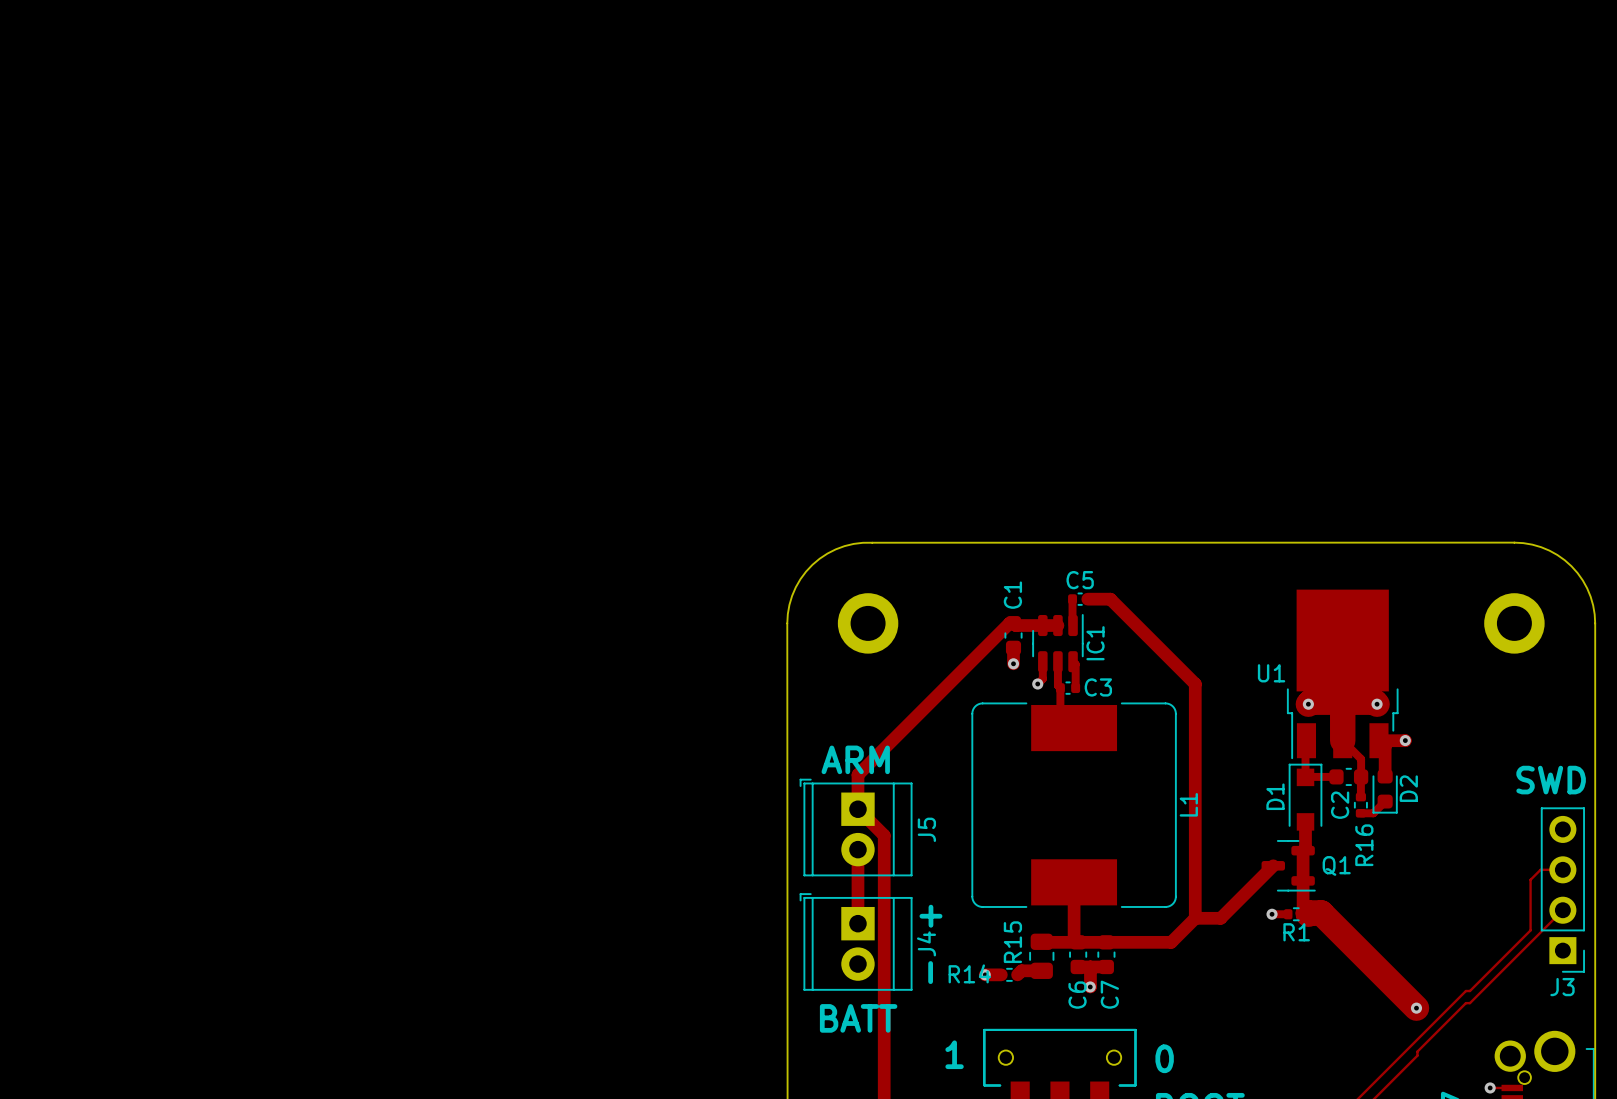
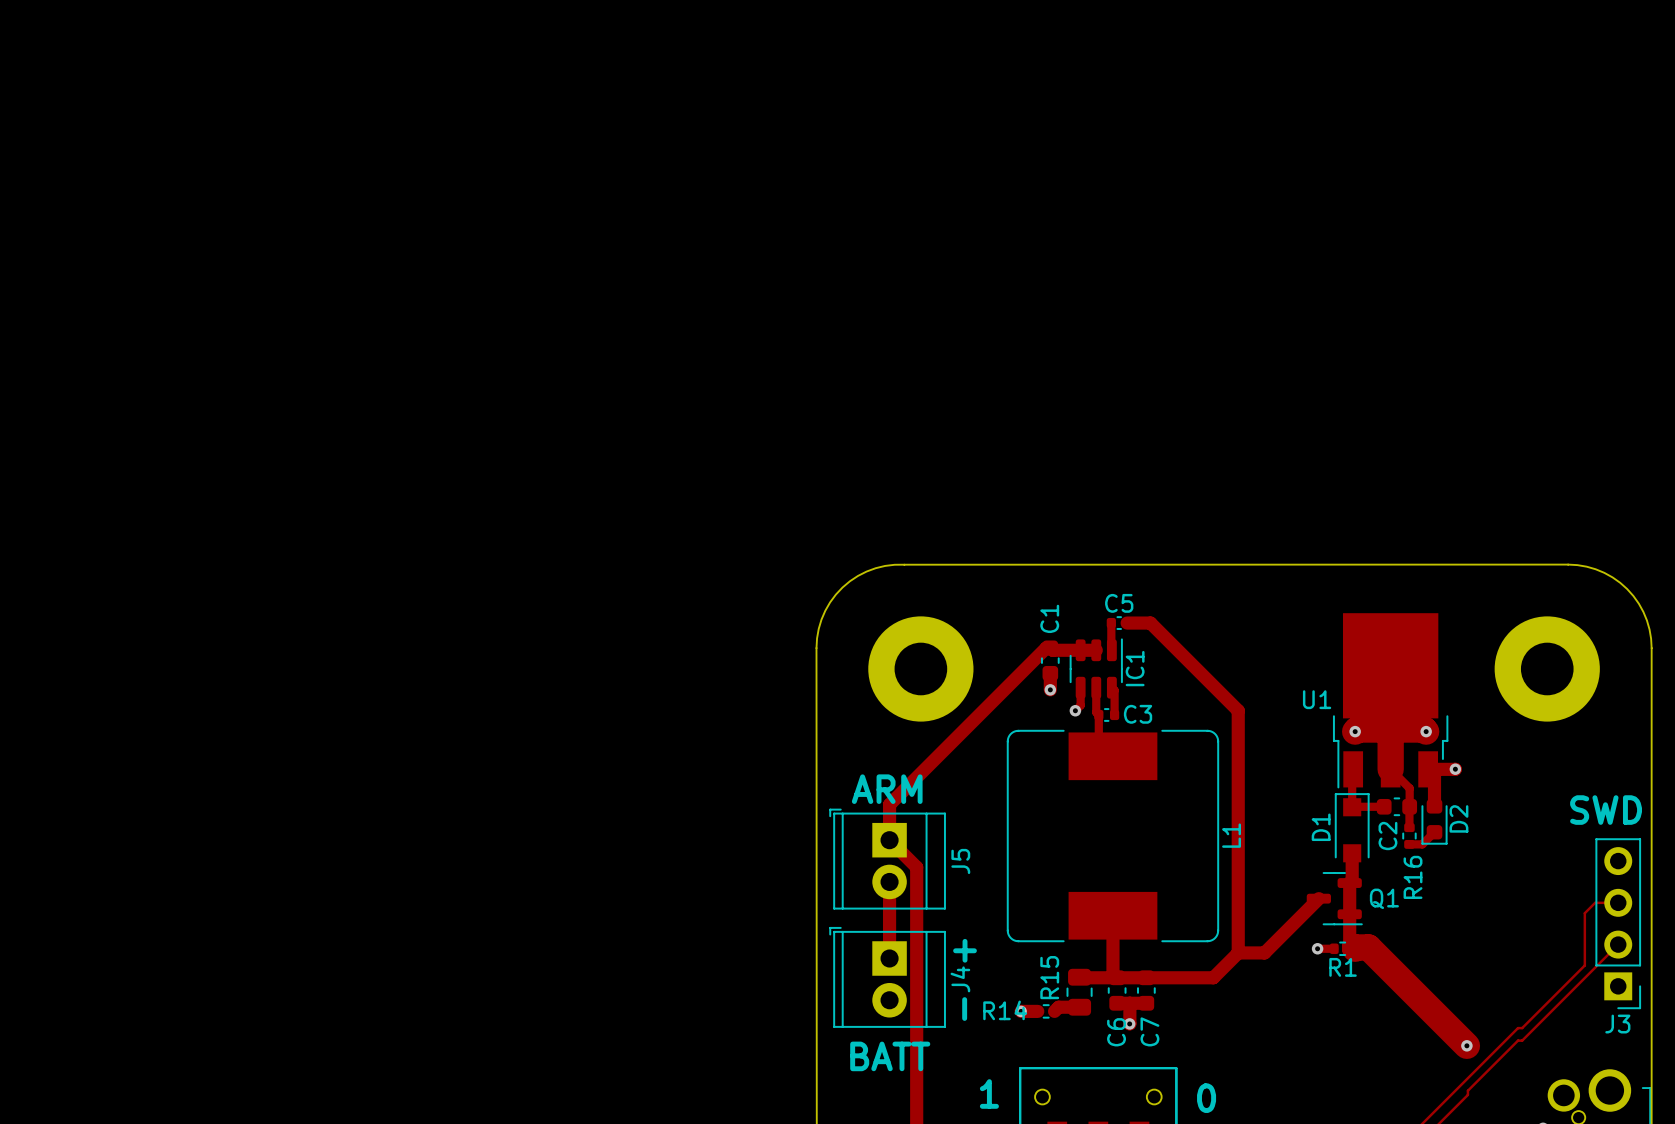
part: (868, 623) -> none
part: (1514, 623) -> none
part: none -> (920, 668)
part: none -> (1547, 668)

